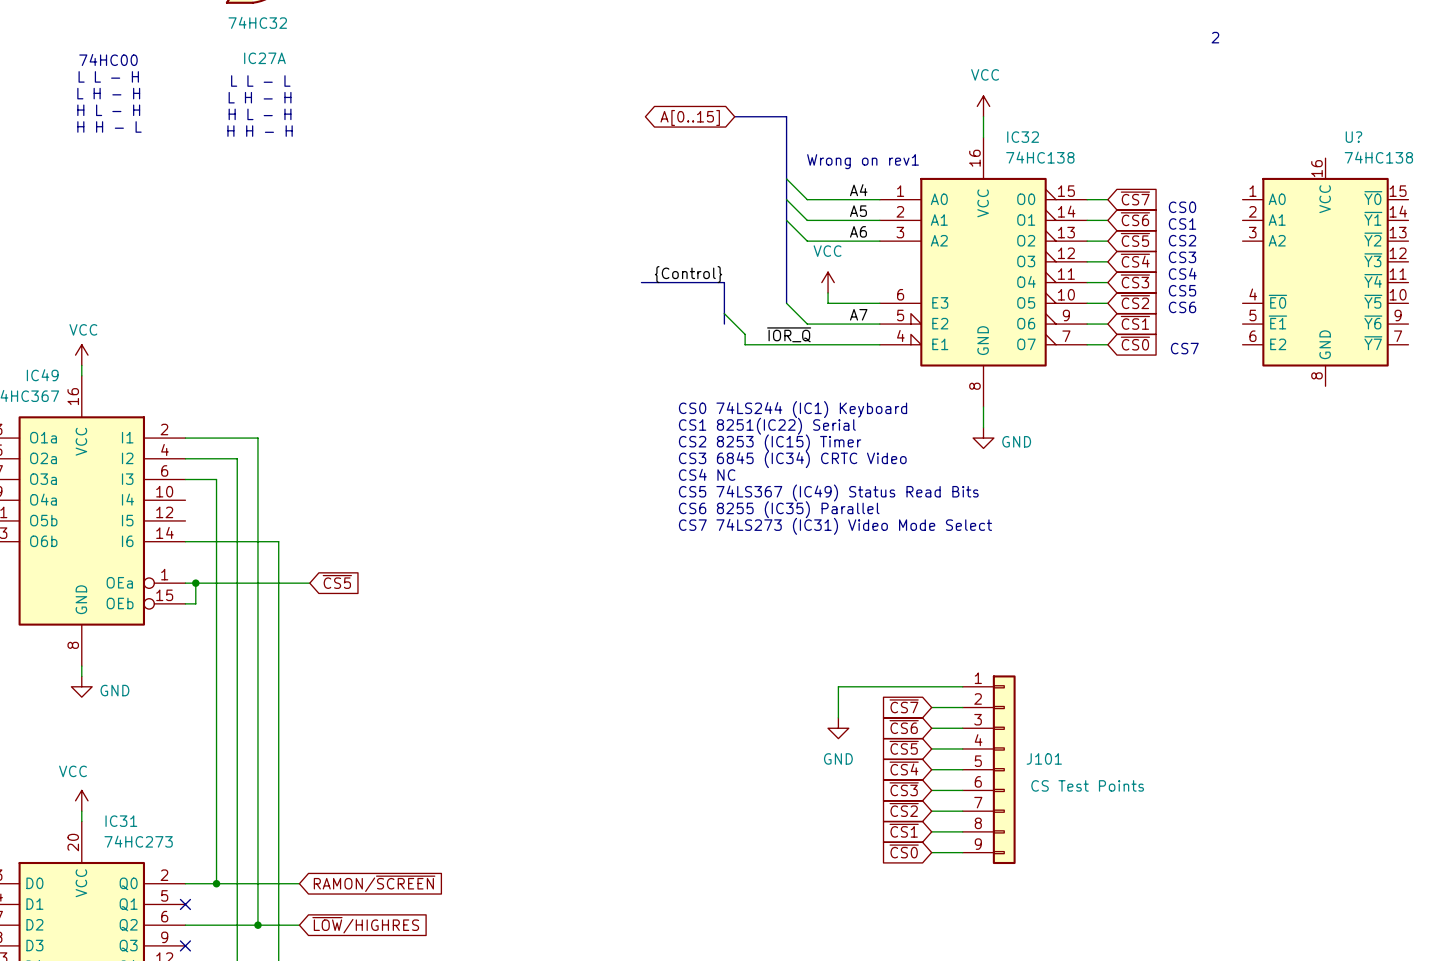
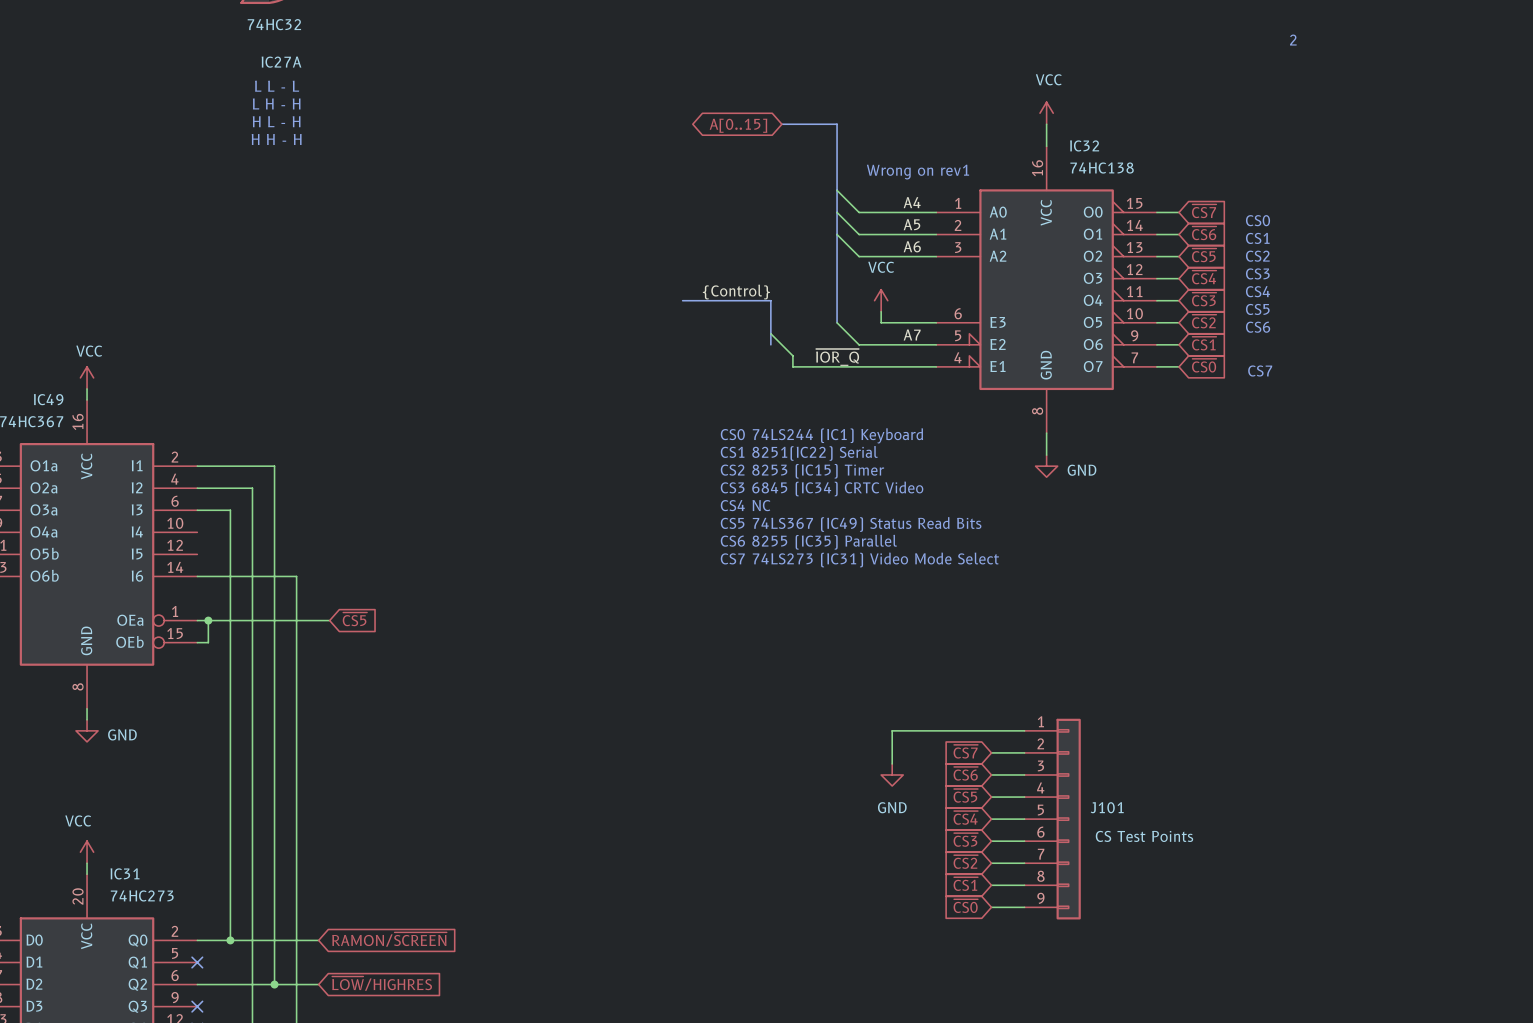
text: 74HC00 (108, 59) -> none
text: L L - H (108, 76) -> none
text: L H - H (108, 93) -> none
text: H L - H (108, 110) -> none
text: H H - L (109, 126) -> none
U?: 74HC138 (1325, 272) -> none

